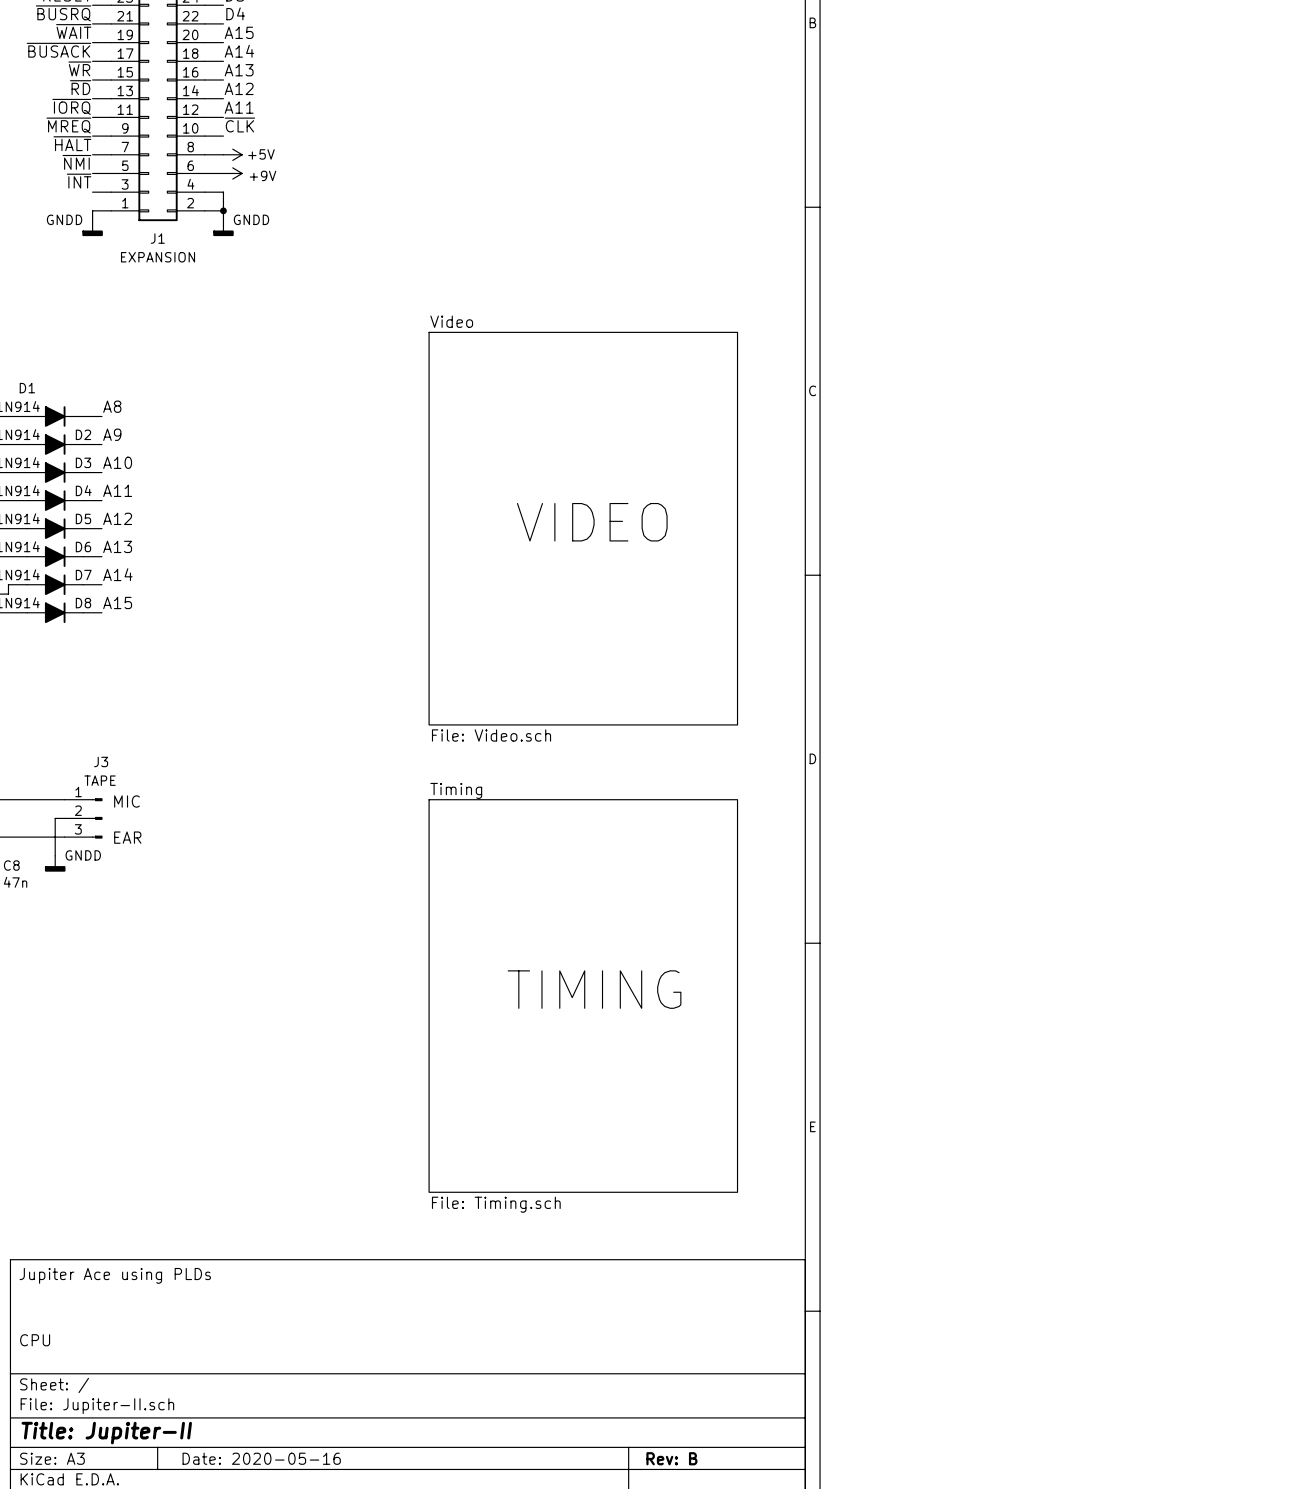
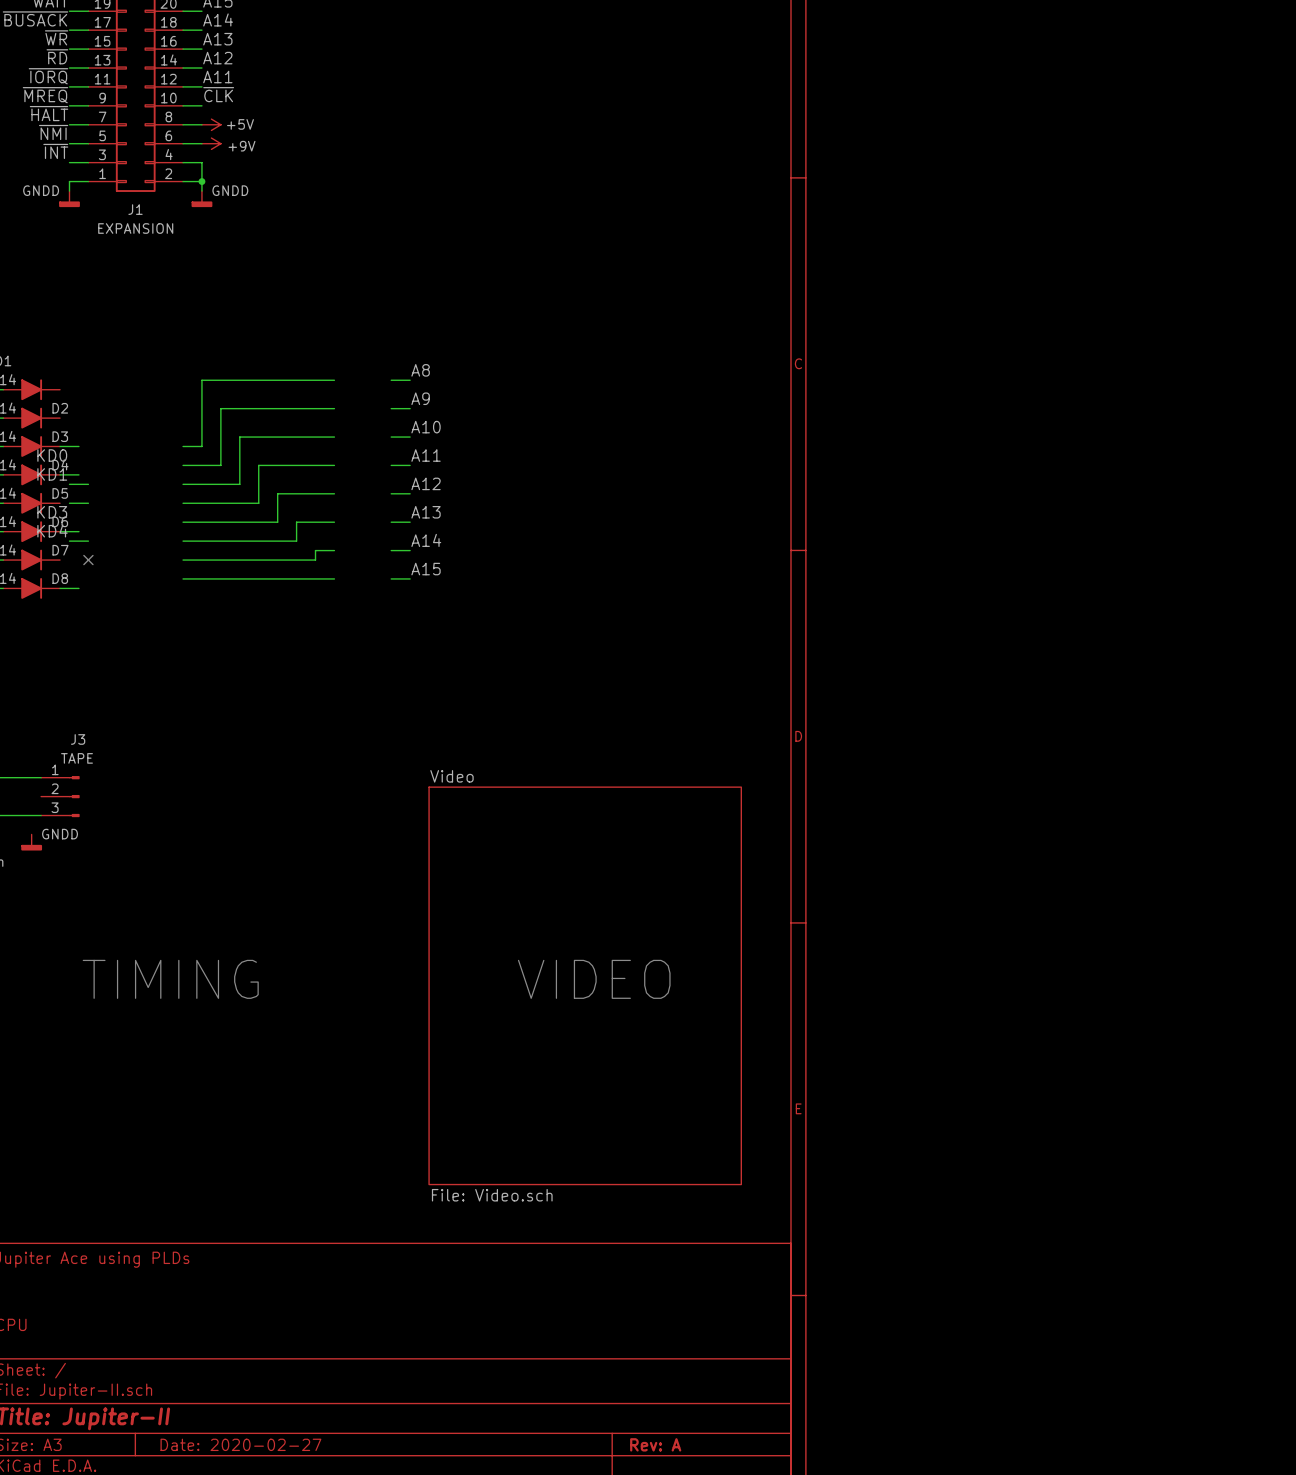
label: none -> A8 (420, 370)
label: A8 (112, 406) -> none
wire: none -> (334, 380) (201, 380) (201, 446) (183, 446)
wire: none -> (391, 380) (410, 380)
wire: (83, 416) (101, 416) -> none
label: none -> A9 (420, 398)
label: A9 (112, 434) -> none
wire: none -> (334, 408) (220, 408) (220, 465) (183, 465)
wire: none -> (391, 408) (410, 408)
wire: (83, 444) (101, 444) -> (69, 484) (88, 484)
label: none -> A10 (426, 427)
label: A10 (117, 462) -> none
wire: none -> (334, 437) (239, 437) (239, 484) (183, 484)
wire: none -> (391, 437) (410, 437)
label: none -> KD0 (52, 455)
label: none -> A11 (426, 455)
label: A11 (117, 490) -> none
wire: none -> (334, 465) (258, 465) (258, 503) (183, 503)
wire: none -> (391, 465) (410, 465)
label: none -> KD1 (52, 474)
label: none -> A12 (426, 483)
label: A12 (117, 518) -> none
wire: none -> (334, 493) (277, 493) (277, 522) (183, 522)
wire: none -> (391, 493) (410, 493)
text: VIDEO (592, 522) -> none
wire: (83, 528) (92, 528) -> (78, 503) (88, 503)
sheet Video: File: Video.sch (583, 528) -> none
label: none -> KD3 (52, 512)
label: none -> A13 (426, 512)
label: A13 (117, 546) -> none
wire: none -> (334, 522) (296, 522) (296, 541) (183, 541)
wire: none -> (391, 522) (410, 522)
label: none -> KD4 (52, 530)
label: none -> A14 (426, 540)
label: A14 (117, 574) -> none
wire: none -> (334, 550) (315, 550) (315, 560) (183, 560)
wire: none -> (391, 550) (410, 550)
wire: (83, 584) (101, 584) -> (69, 541) (88, 541)
no-connect mark: none -> (88, 560)
label: none -> A15 (426, 569)
label: A15 (117, 602) -> none
wire: none -> (183, 578) (334, 578)
wire: none -> (391, 578) (410, 578)
text: MIC (126, 801) -> none
wire: (64, 818) (55, 818) (55, 855) -> none
text: EAR (127, 837) -> none
text: TIMING (594, 989) -> none
sheet Timing: File: Timing.sch (583, 995) -> none
text: none -> TIMING (170, 979)
text: none -> VIDEO (594, 979)
sheet Video: none -> File: Video.sch (585, 985)
title block: Date: 2020-05-16 (261, 1458) -> Date: 2020-02-27 (240, 1444)
title block: Rev: B (671, 1458) -> Rev: A (655, 1444)

